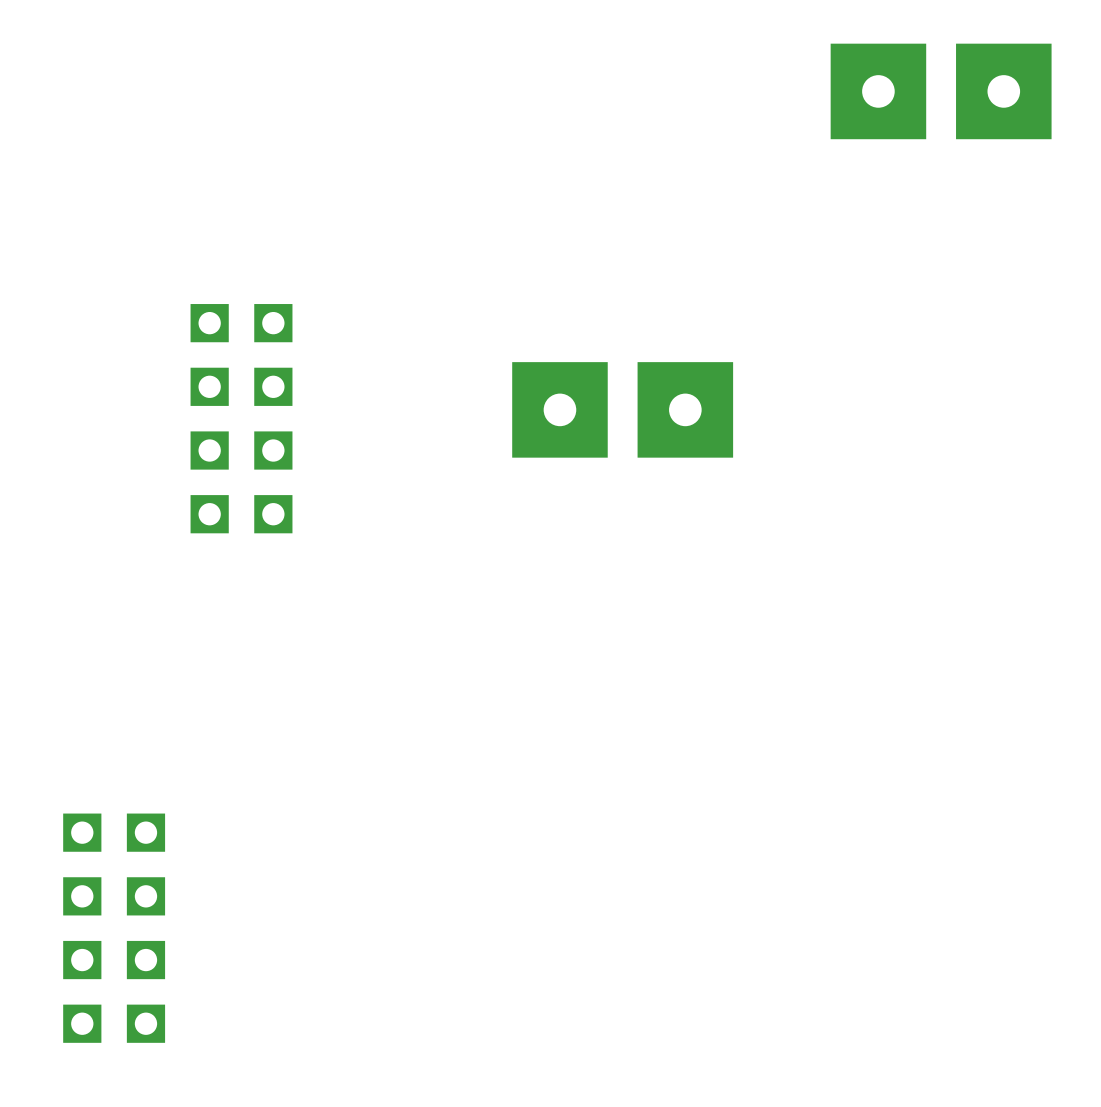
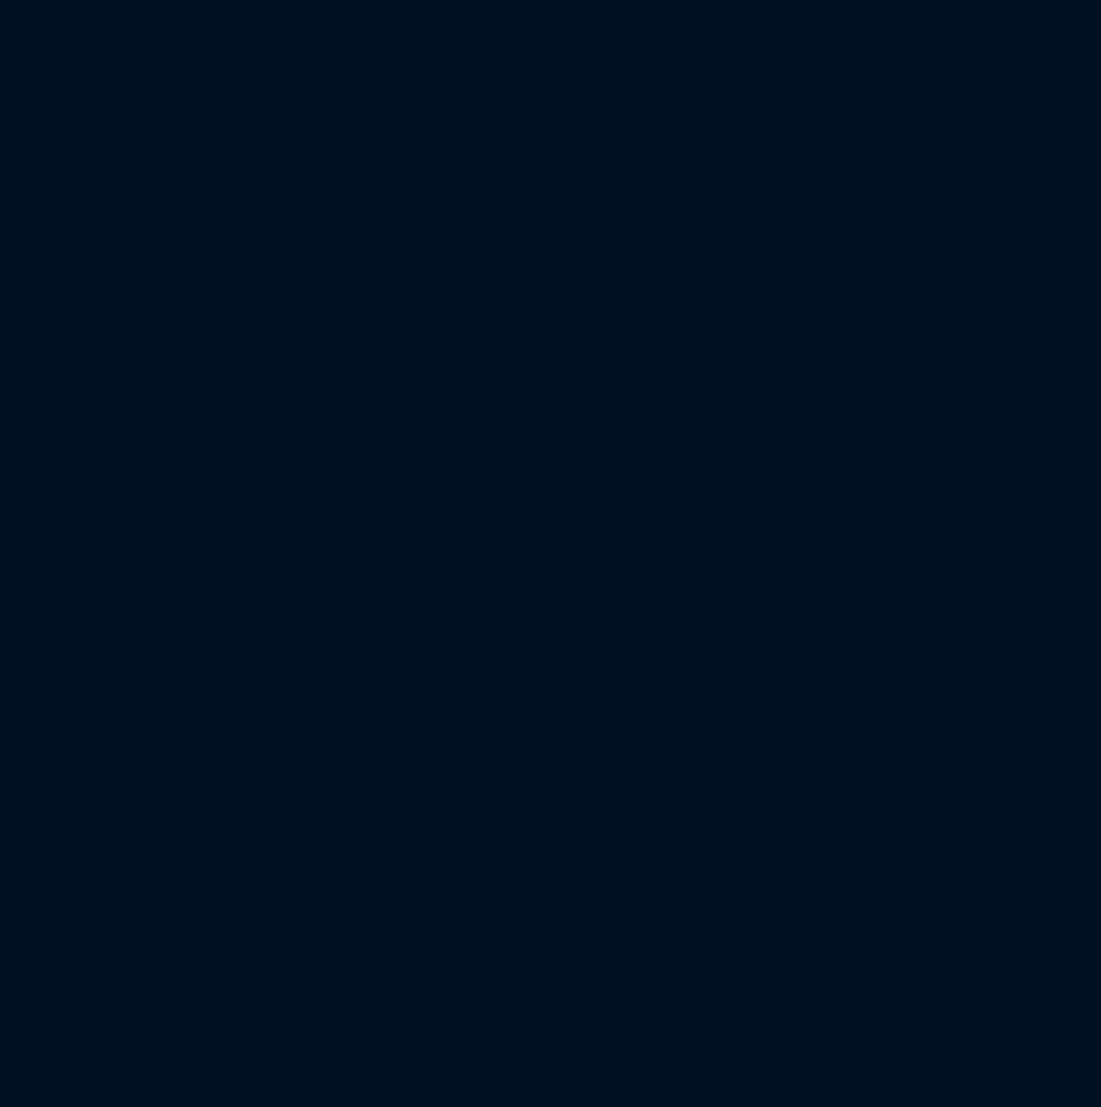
part: (941, 91) -> none
part: (622, 409) -> none
part: (241, 418) -> none
part: (114, 928) -> none

